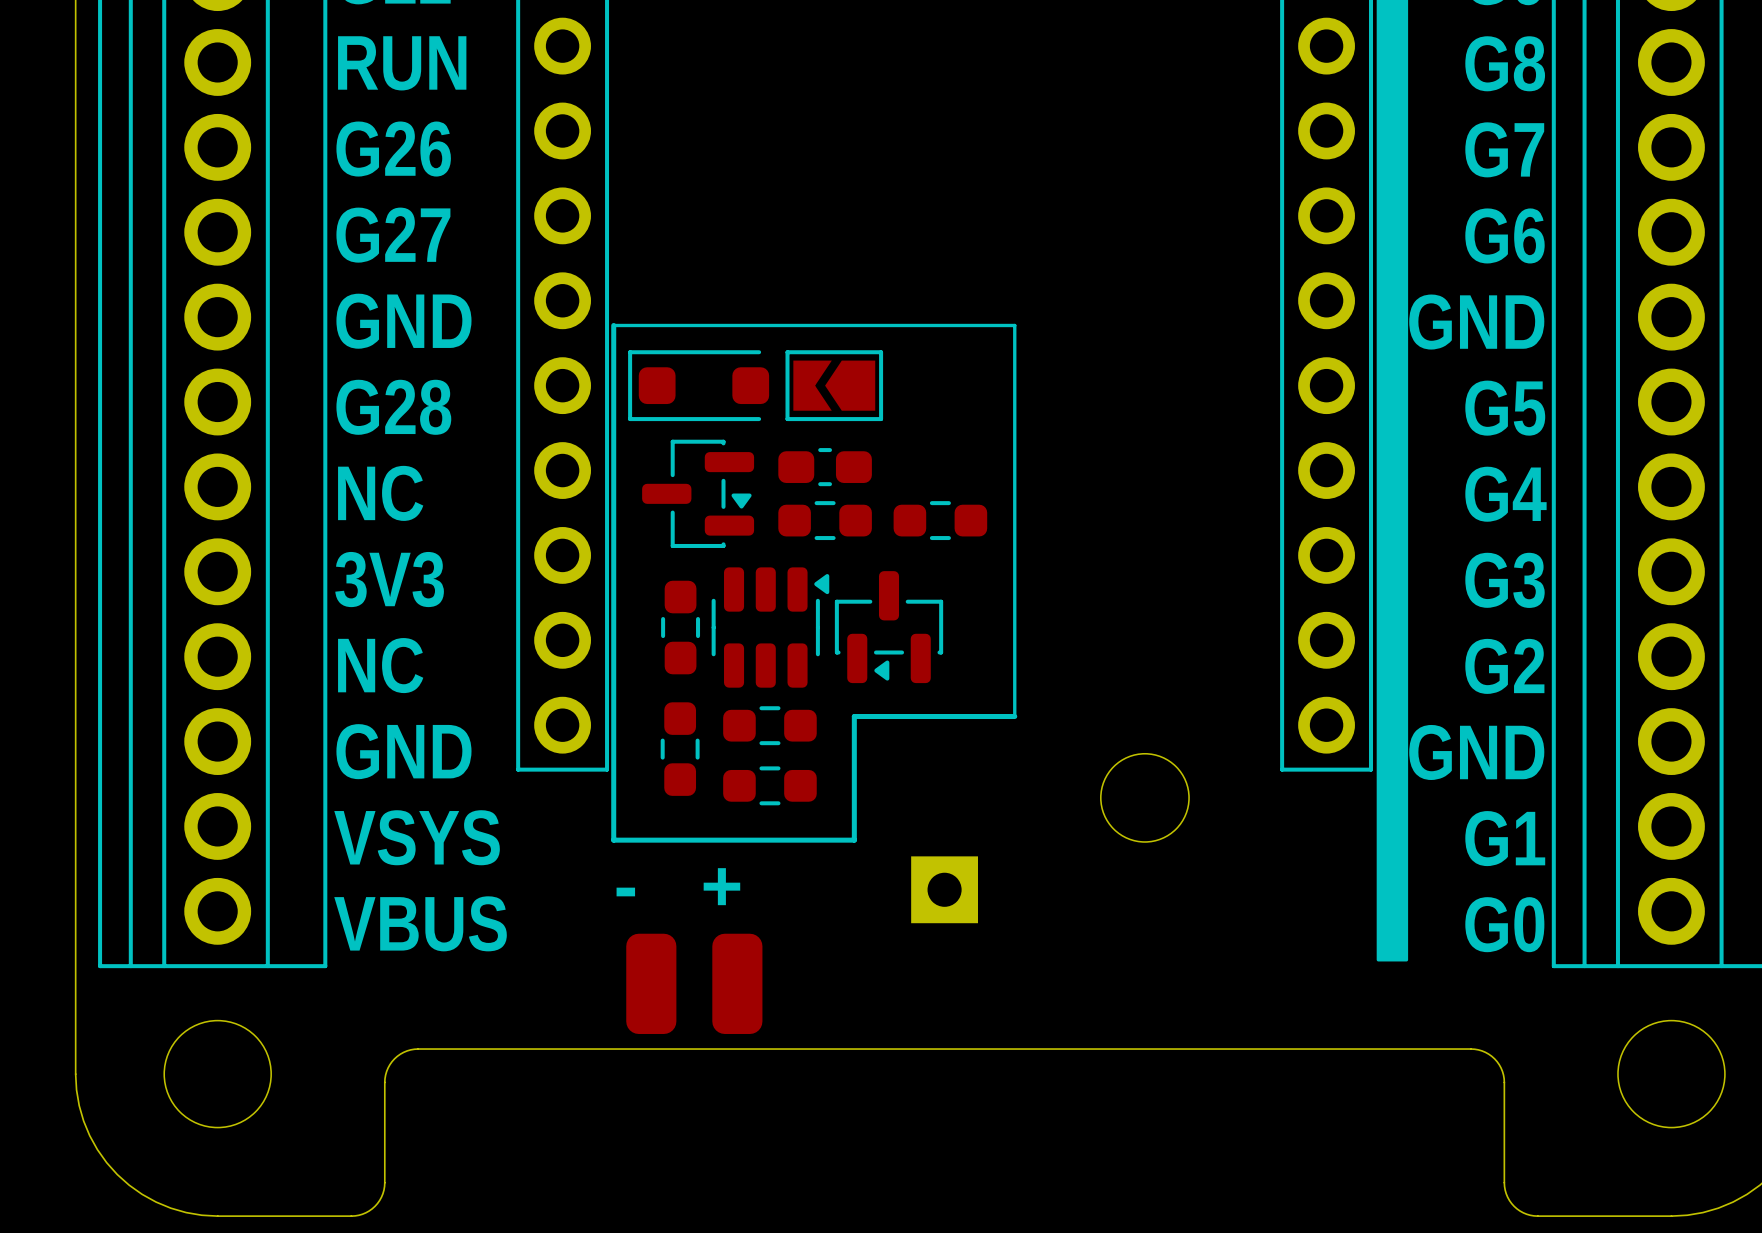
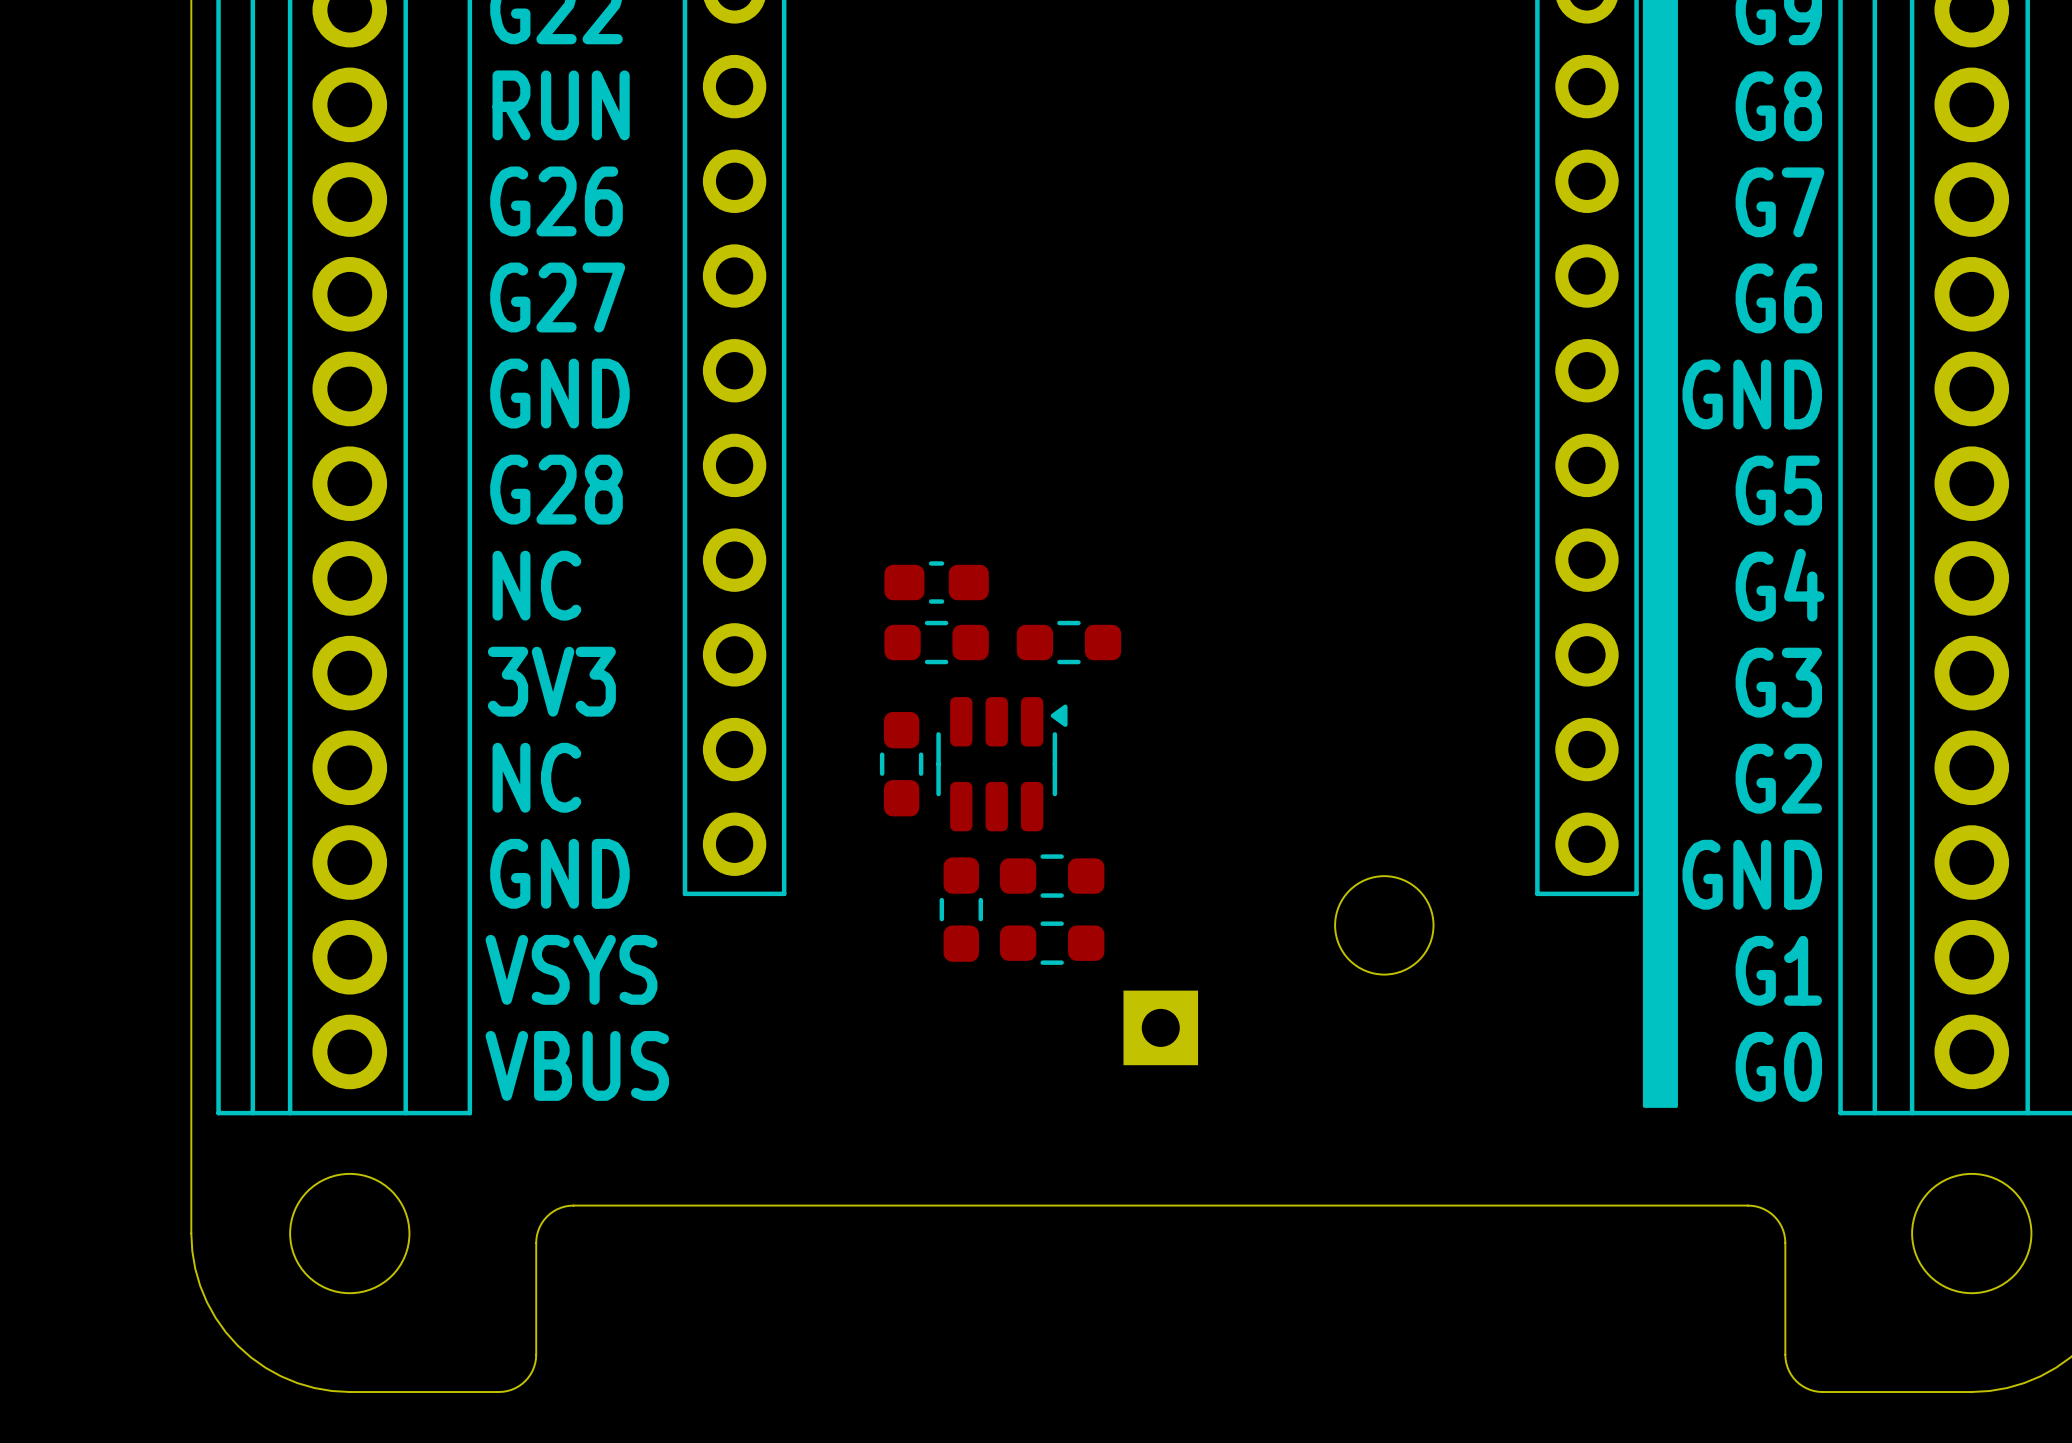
line: (613, 325) (1014, 325) (1014, 716) (854, 716) (854, 840) (613, 840) (613, 325) -> none
part: (698, 385) -> none
part: (834, 385) -> none
part position: (825, 467) -> (936, 582)
part: (698, 493) -> none
part: (825, 520) -> none
part: (940, 520) -> none
part: none -> (936, 642)
part: none -> (1068, 642)
part position: (680, 627) -> (901, 764)
part position: (770, 627) -> (1001, 764)
part: (889, 627) -> none
part: (769, 725) -> none
part: (680, 749) -> none
part: none -> (1052, 876)
part rotation: 0° (769, 785) -> 90° clockwise (961, 909)
part: none -> (1052, 943)
text: + (721, 886) -> none
text: - (625, 891) -> none
part: (651, 983) -> none
part: (737, 983) -> none

